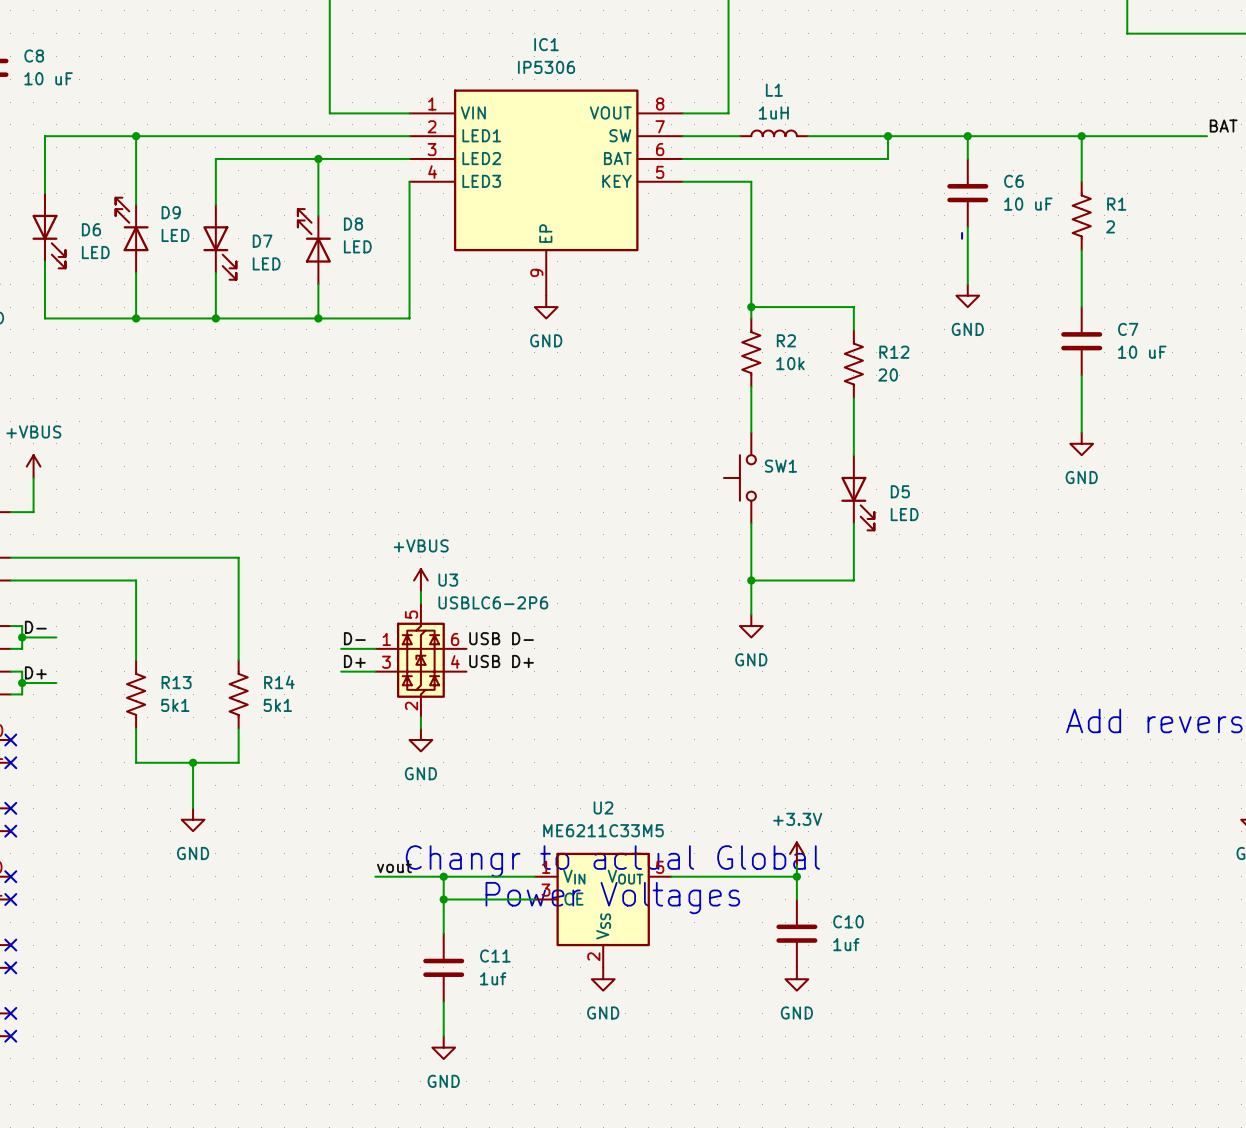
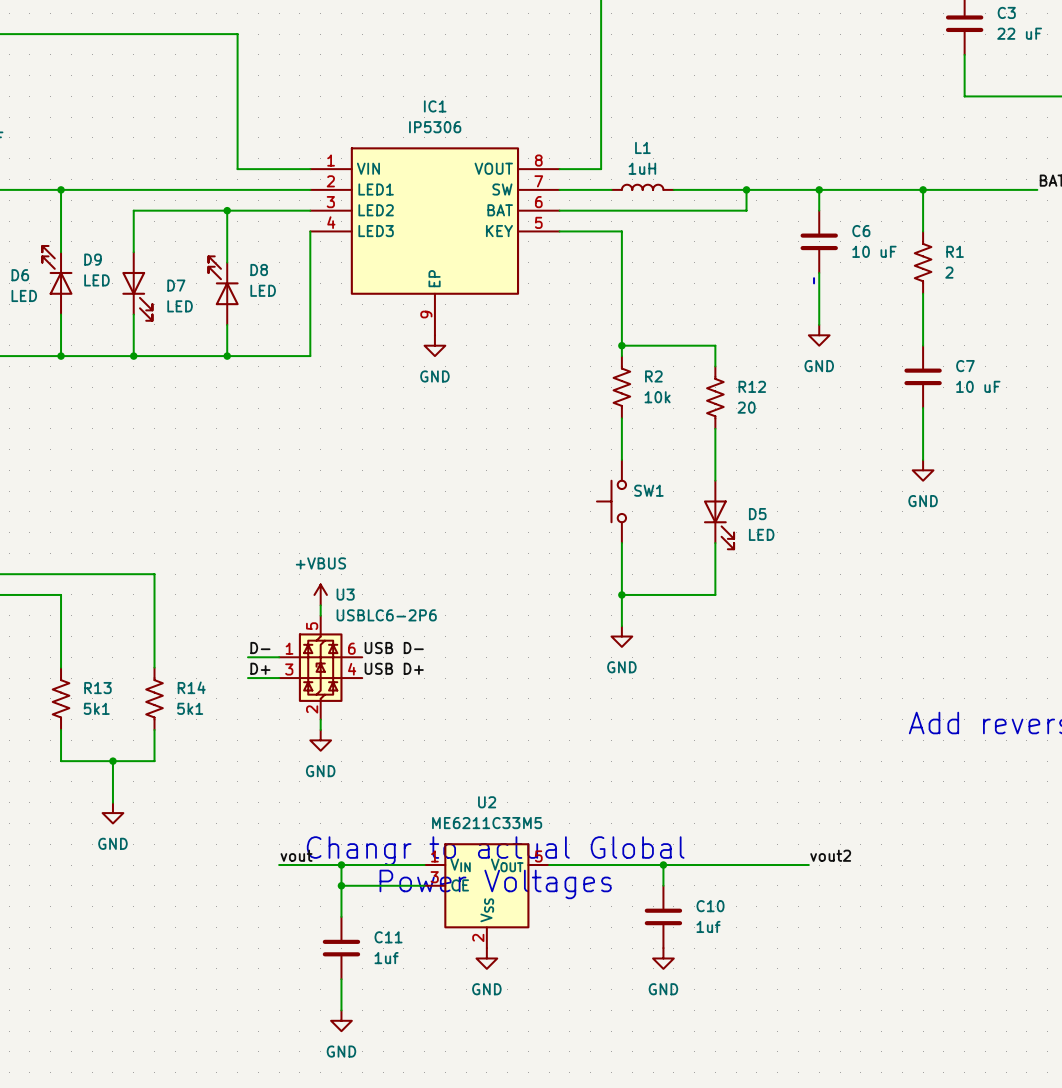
power symbol: +3.3V (796, 853) -> none
wire: (796, 865) (796, 876) -> (808, 865) (663, 865)
label: none -> vout2 (830, 855)

